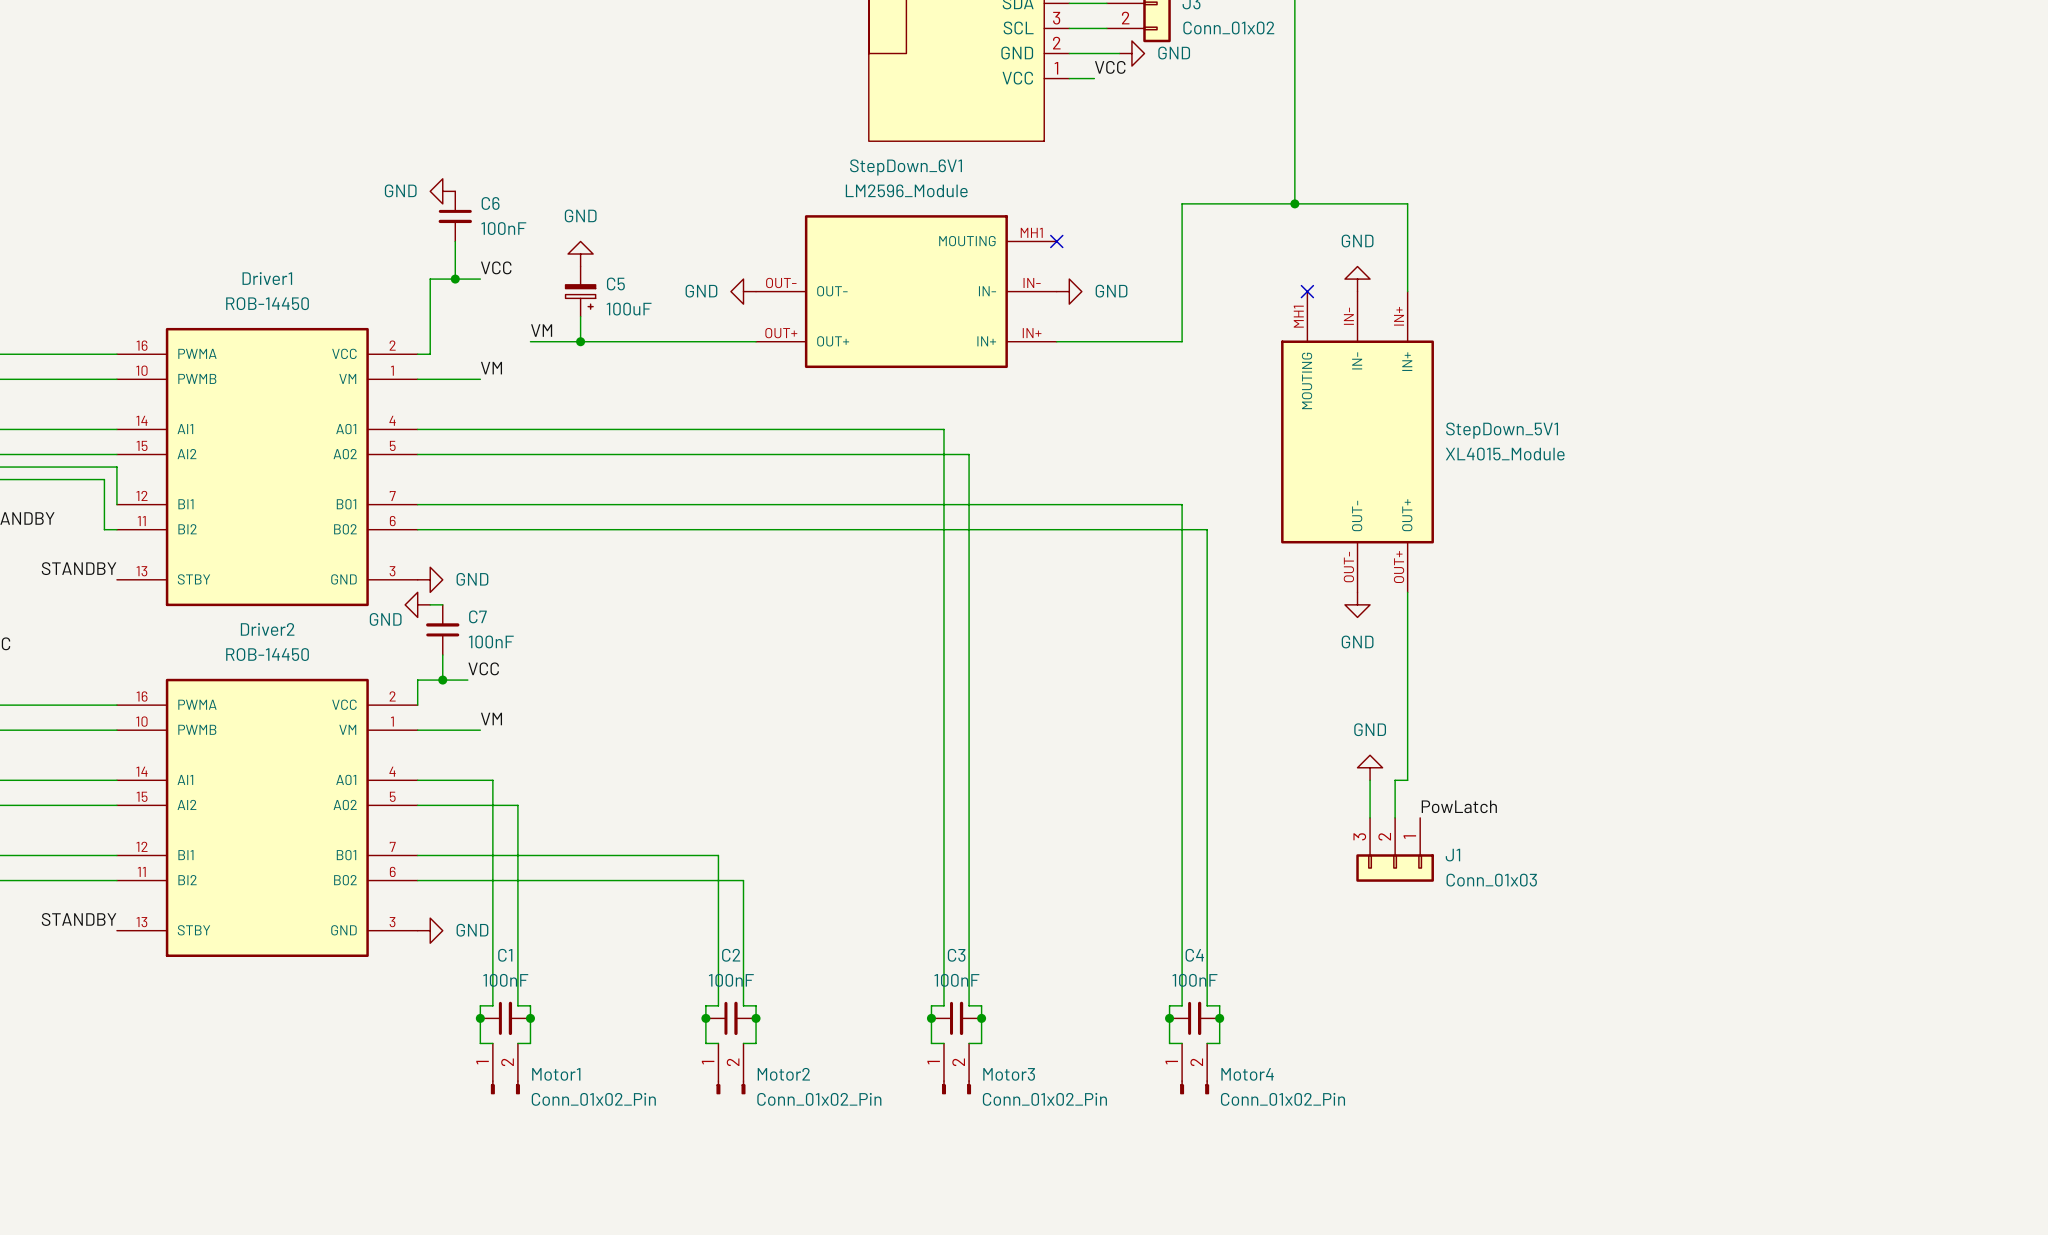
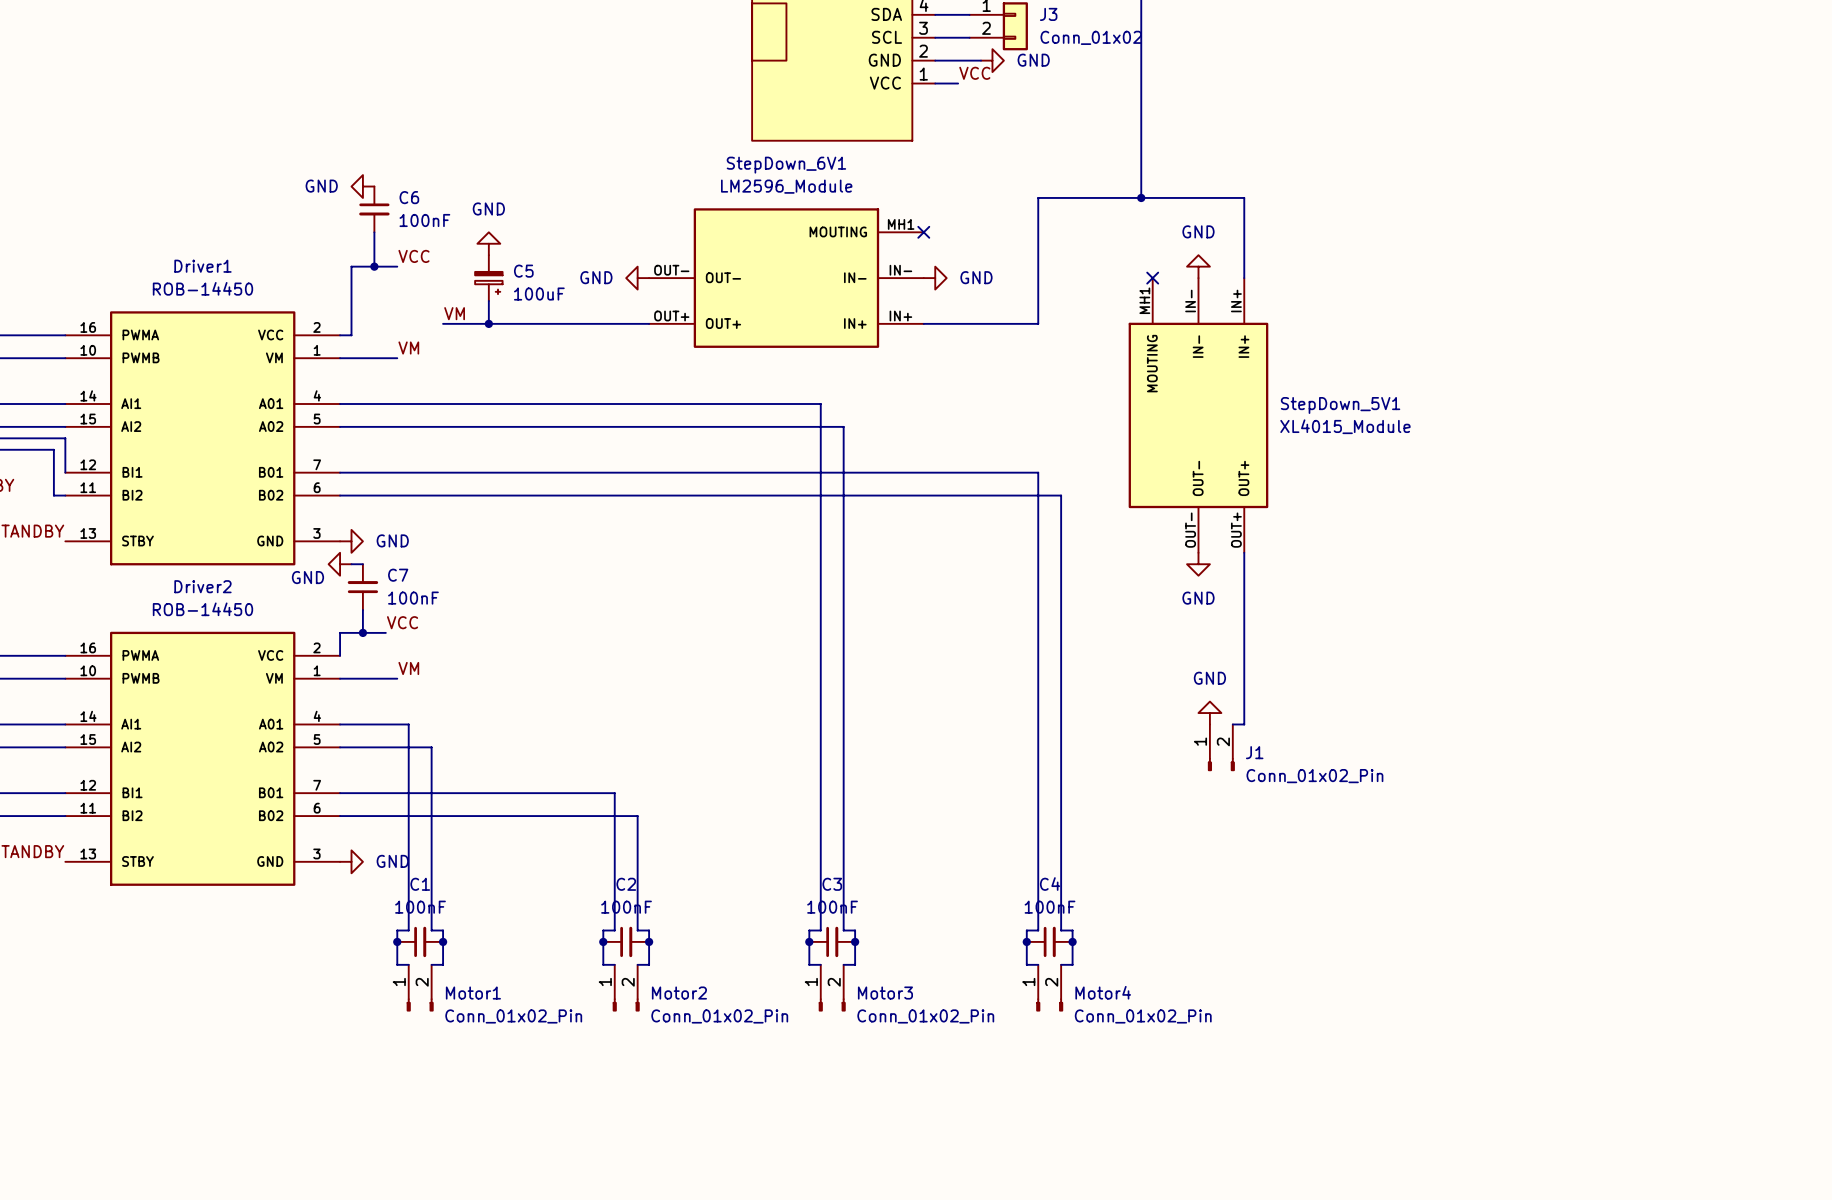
label: PowLatch (1459, 806) -> none
J1 symbol: [1356, 817, 1434, 882] -> [1208, 724, 1235, 771]
J1 name position: J1 (1452, 855) -> J1 (1254, 752)
J1 value: Conn_01x03 (1491, 880) -> Conn_01x02_Pin (1314, 776)

